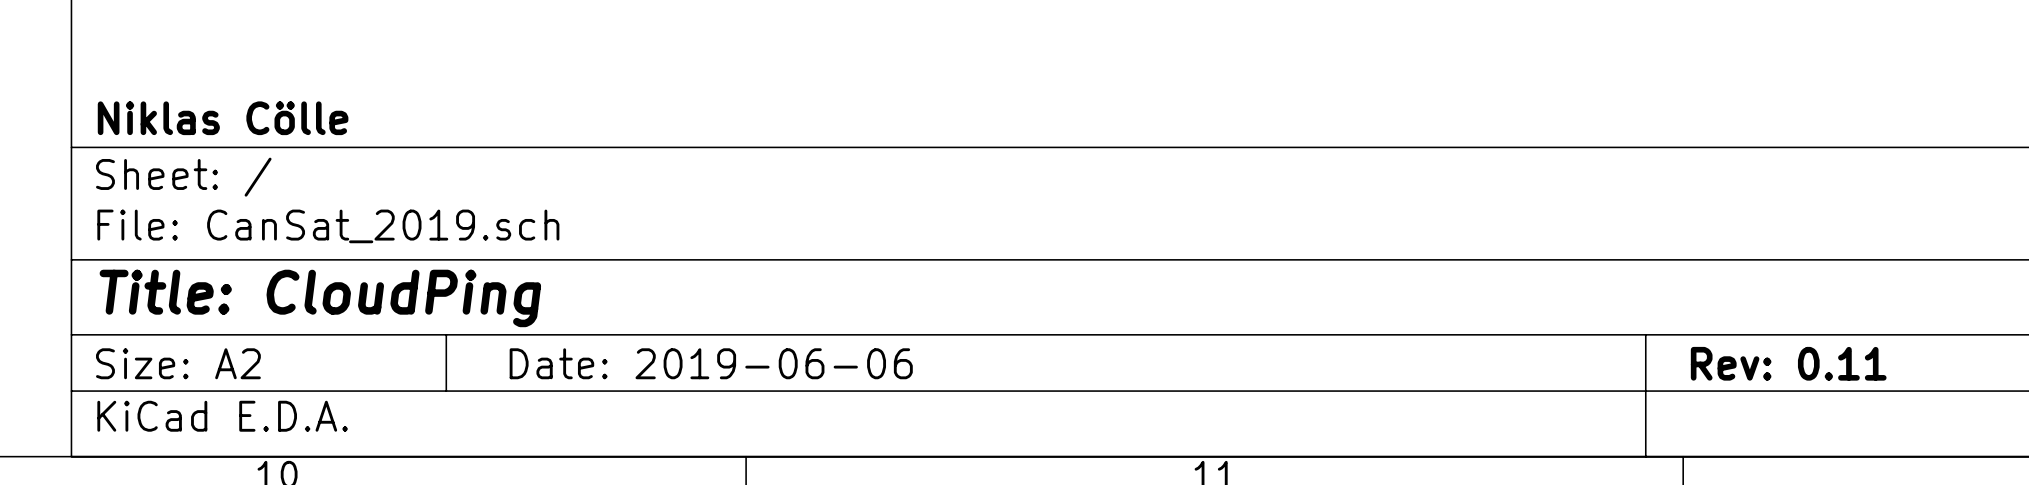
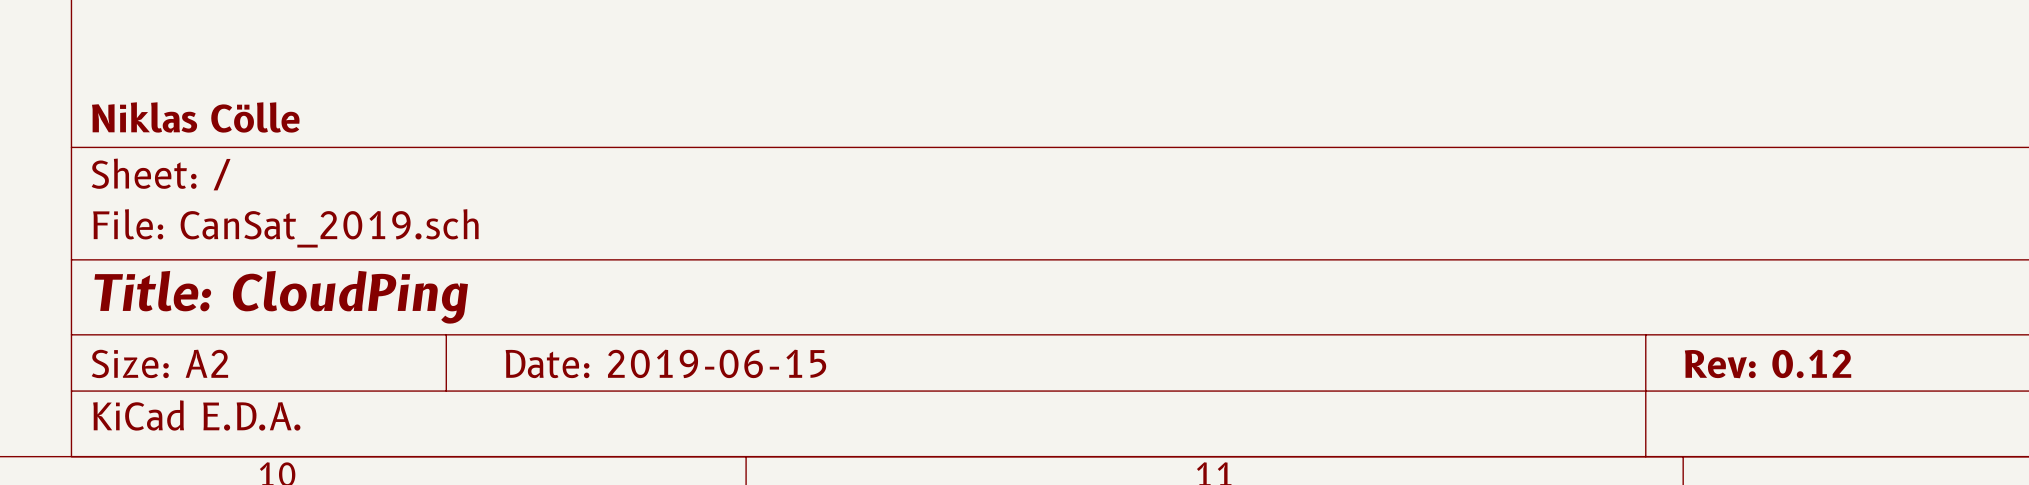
title block: Date: 2019-06-06 (711, 363) -> Date: 2019-06-15 (665, 363)
title block: Rev: 0.11 (1788, 363) -> Rev: 0.12 (1768, 364)

